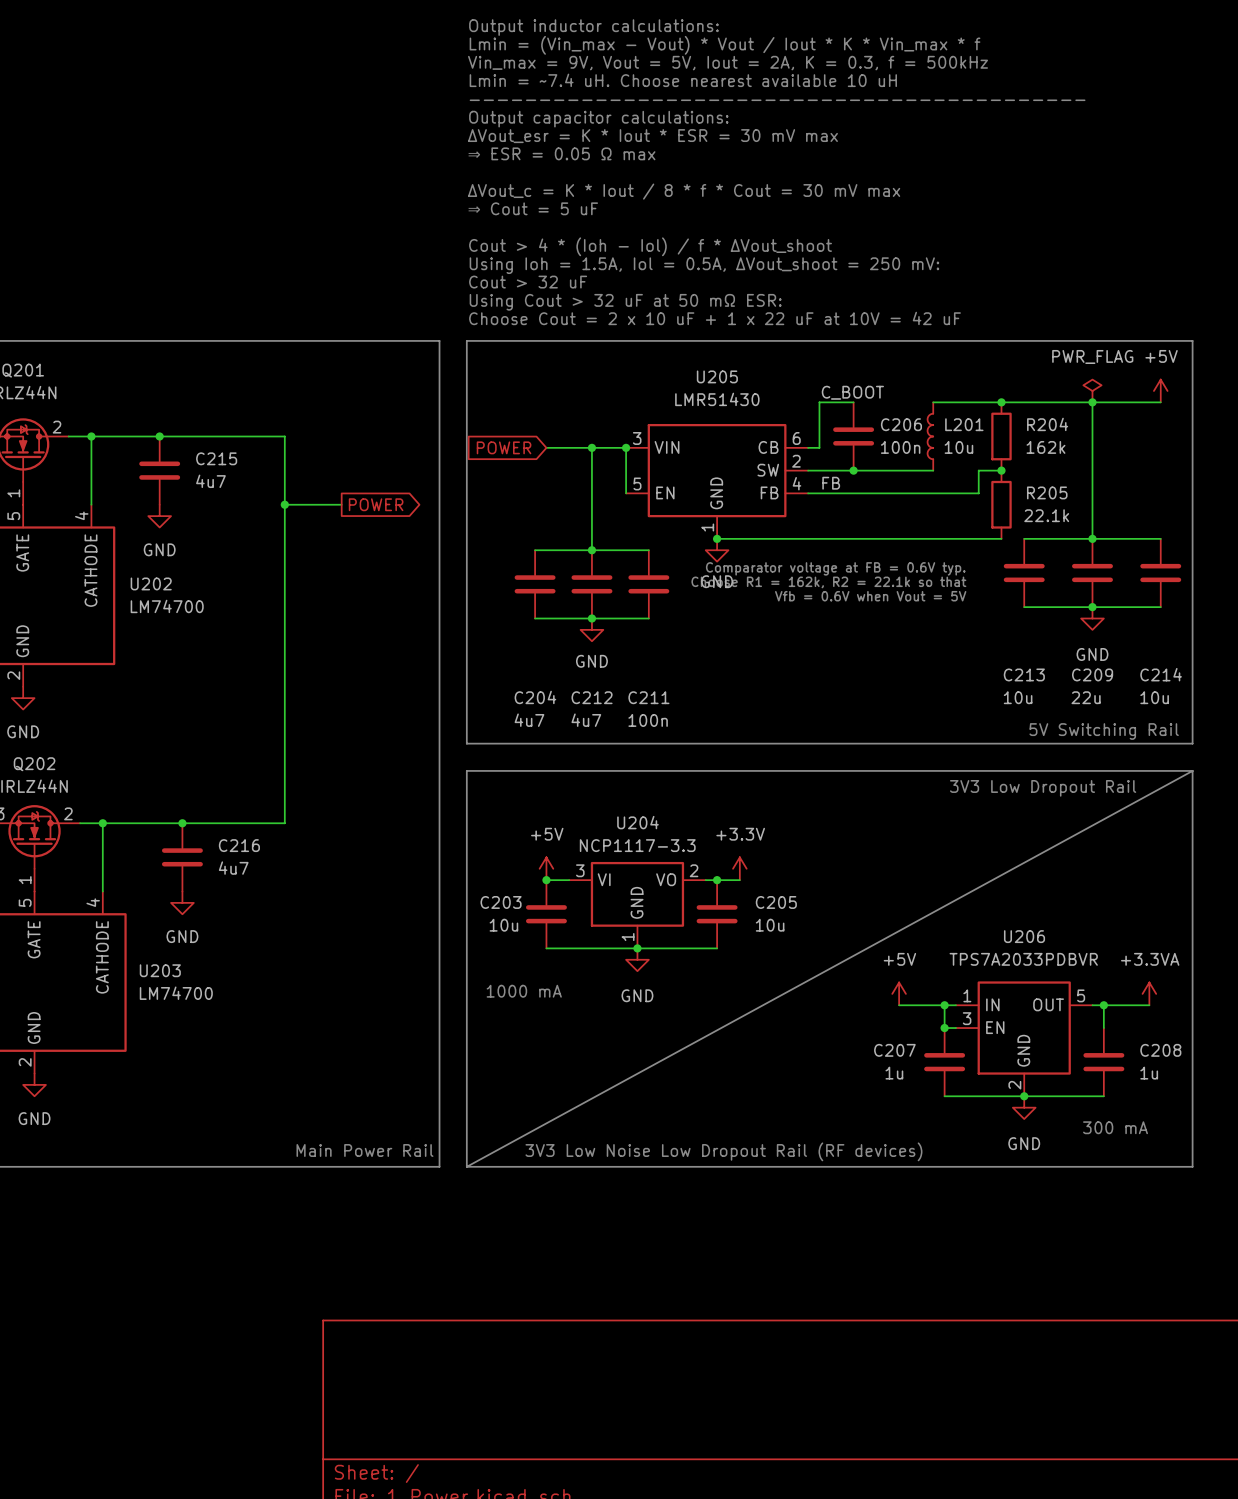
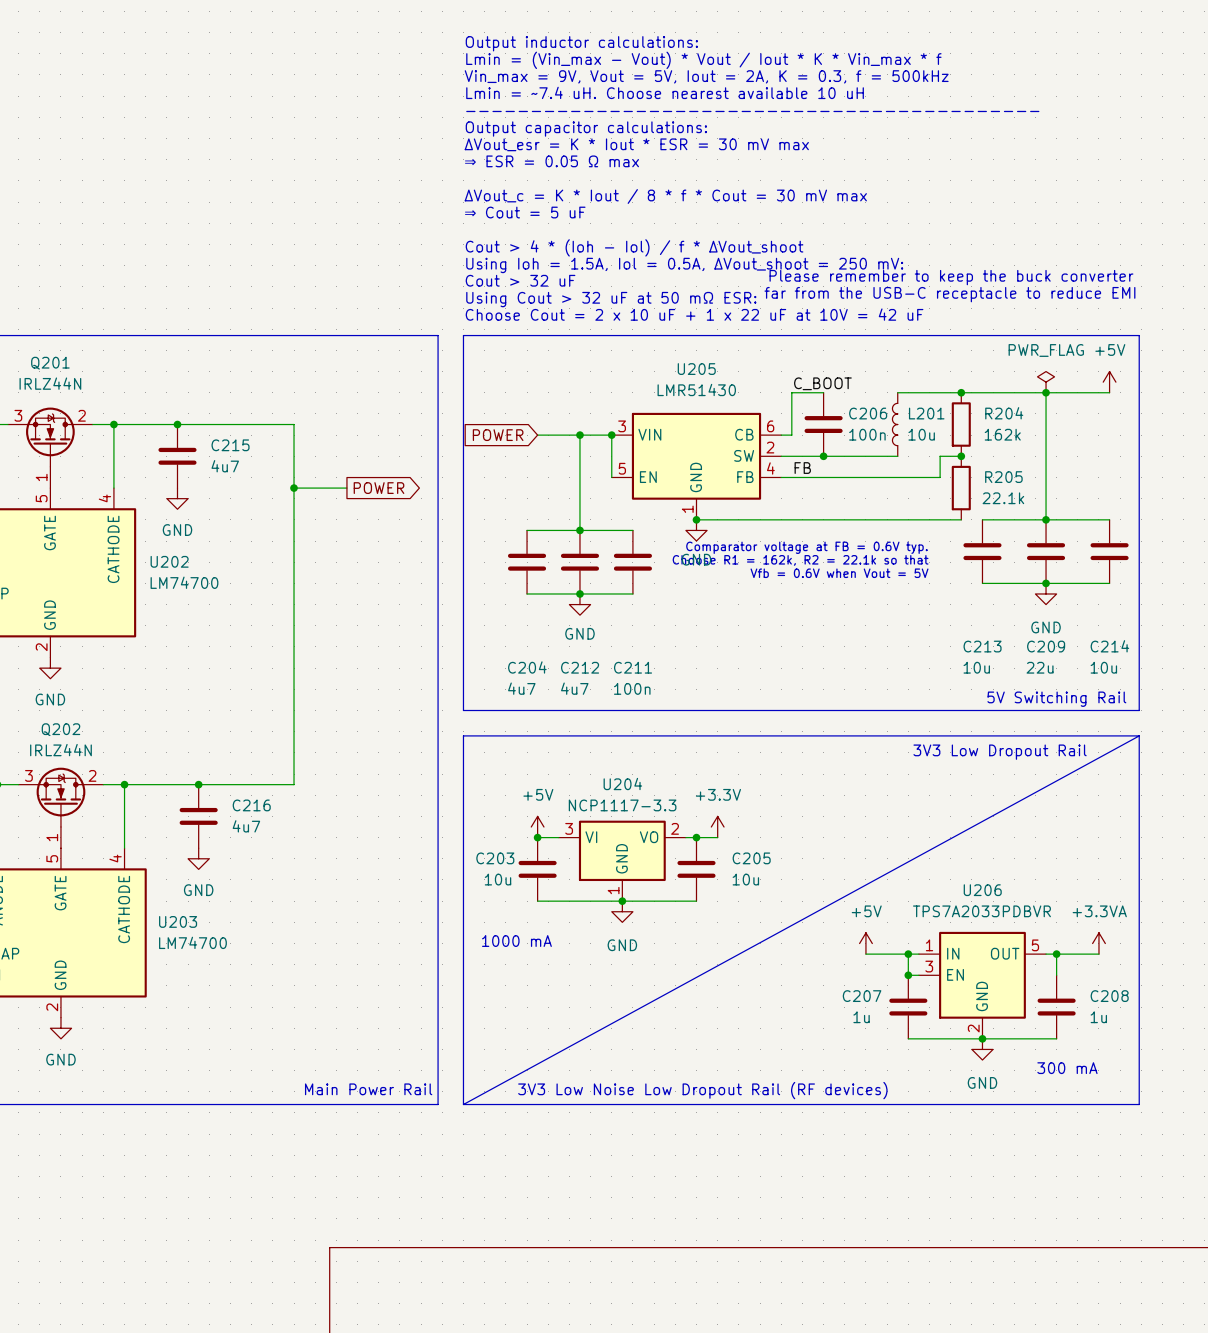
text: none -> Please remember to keep the buck converter (951, 277)
text: none -> far from the USB-C receptacle to reduce EMI (949, 294)

